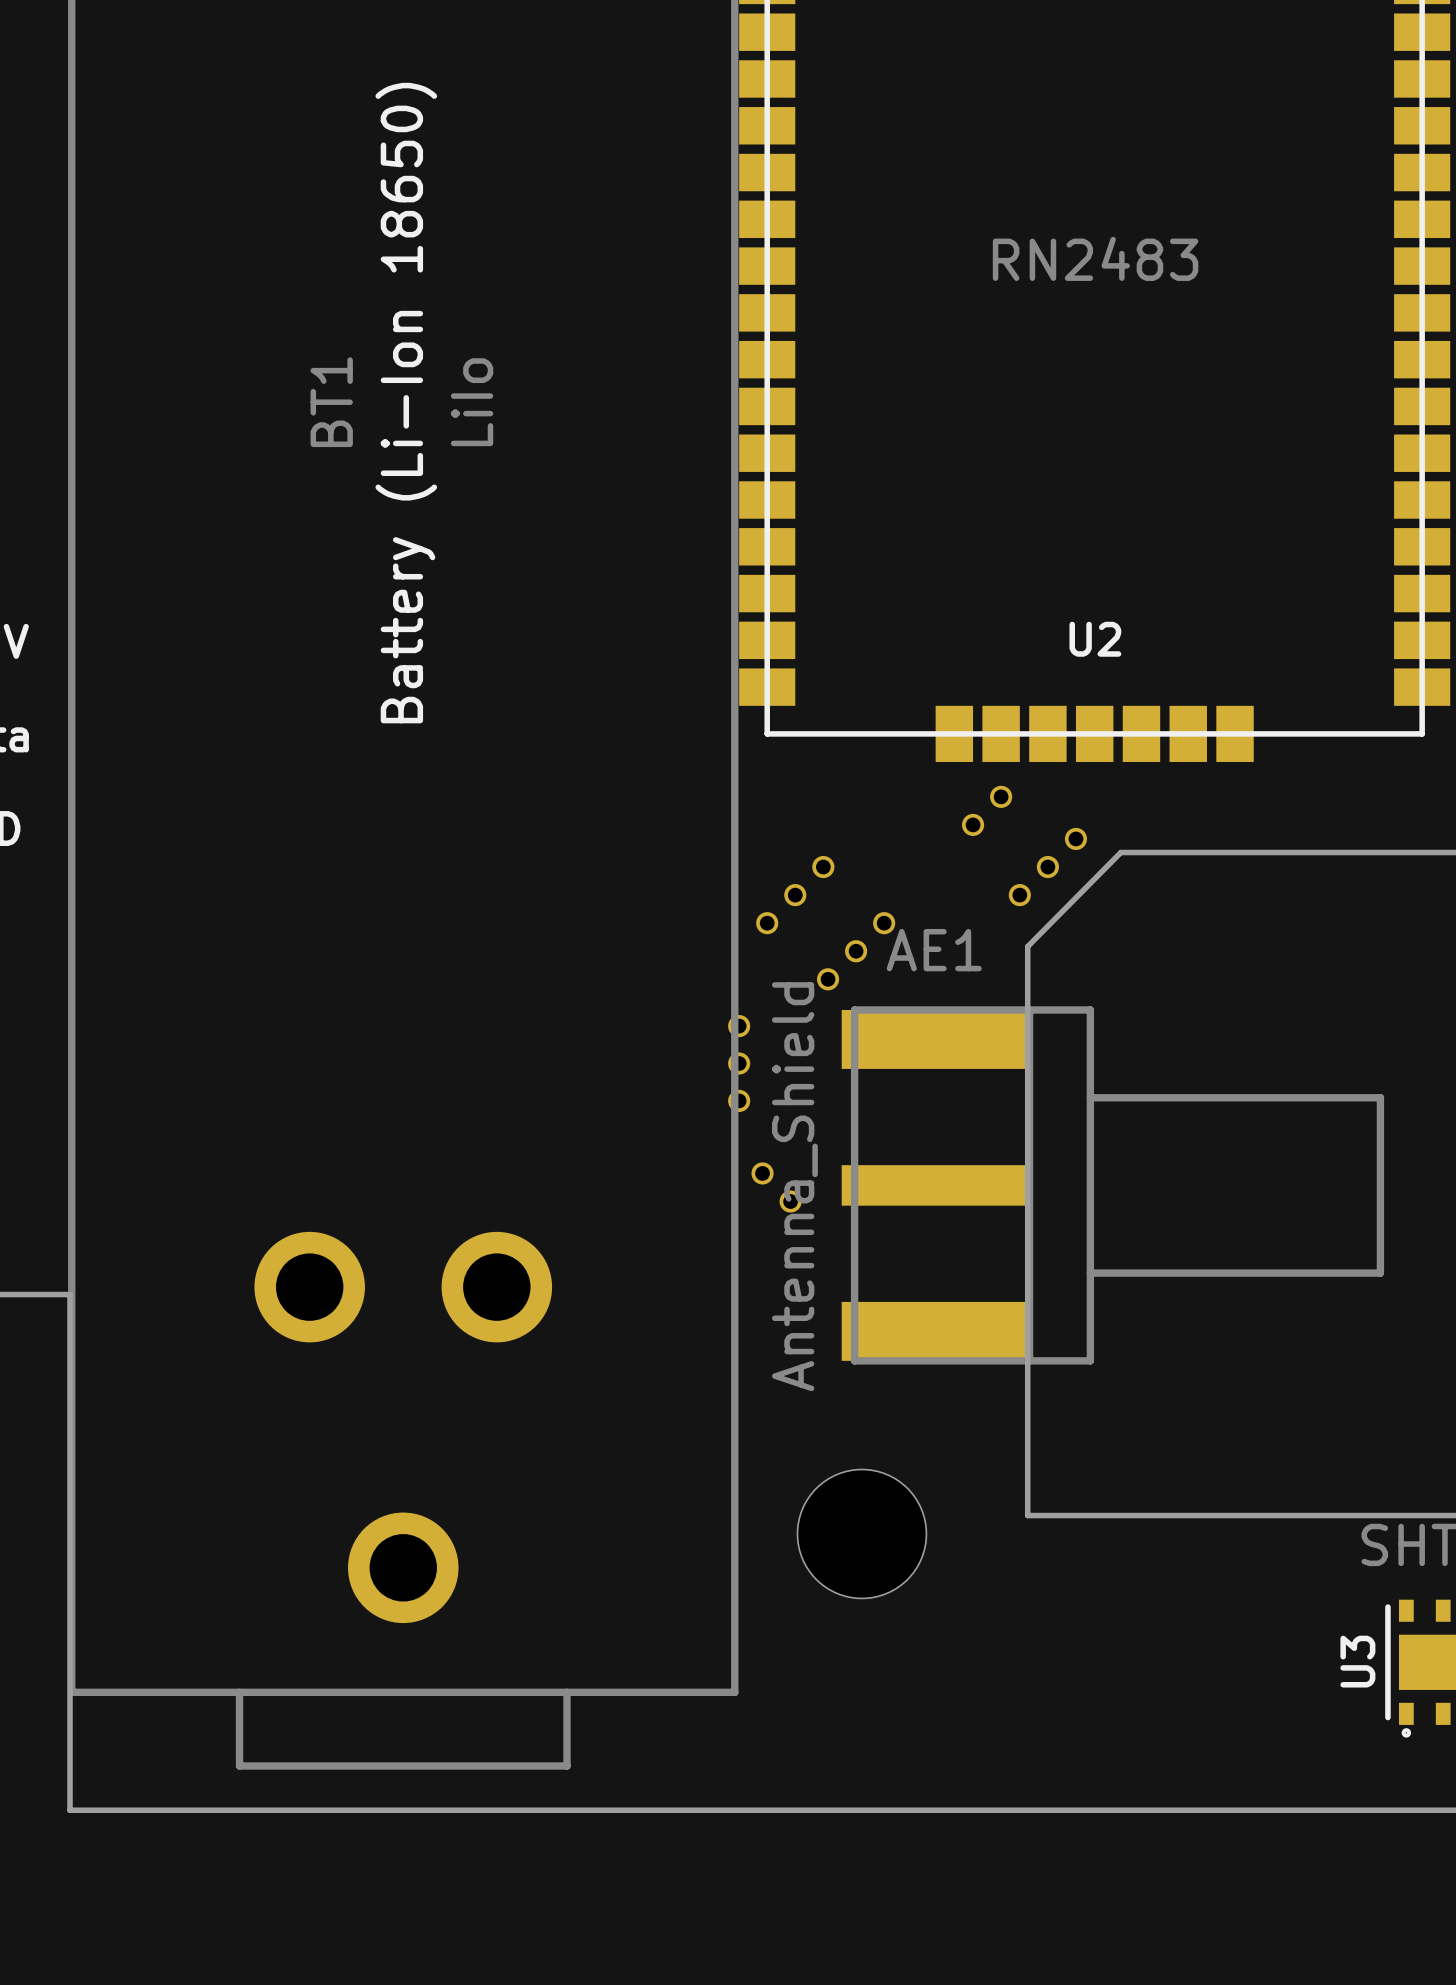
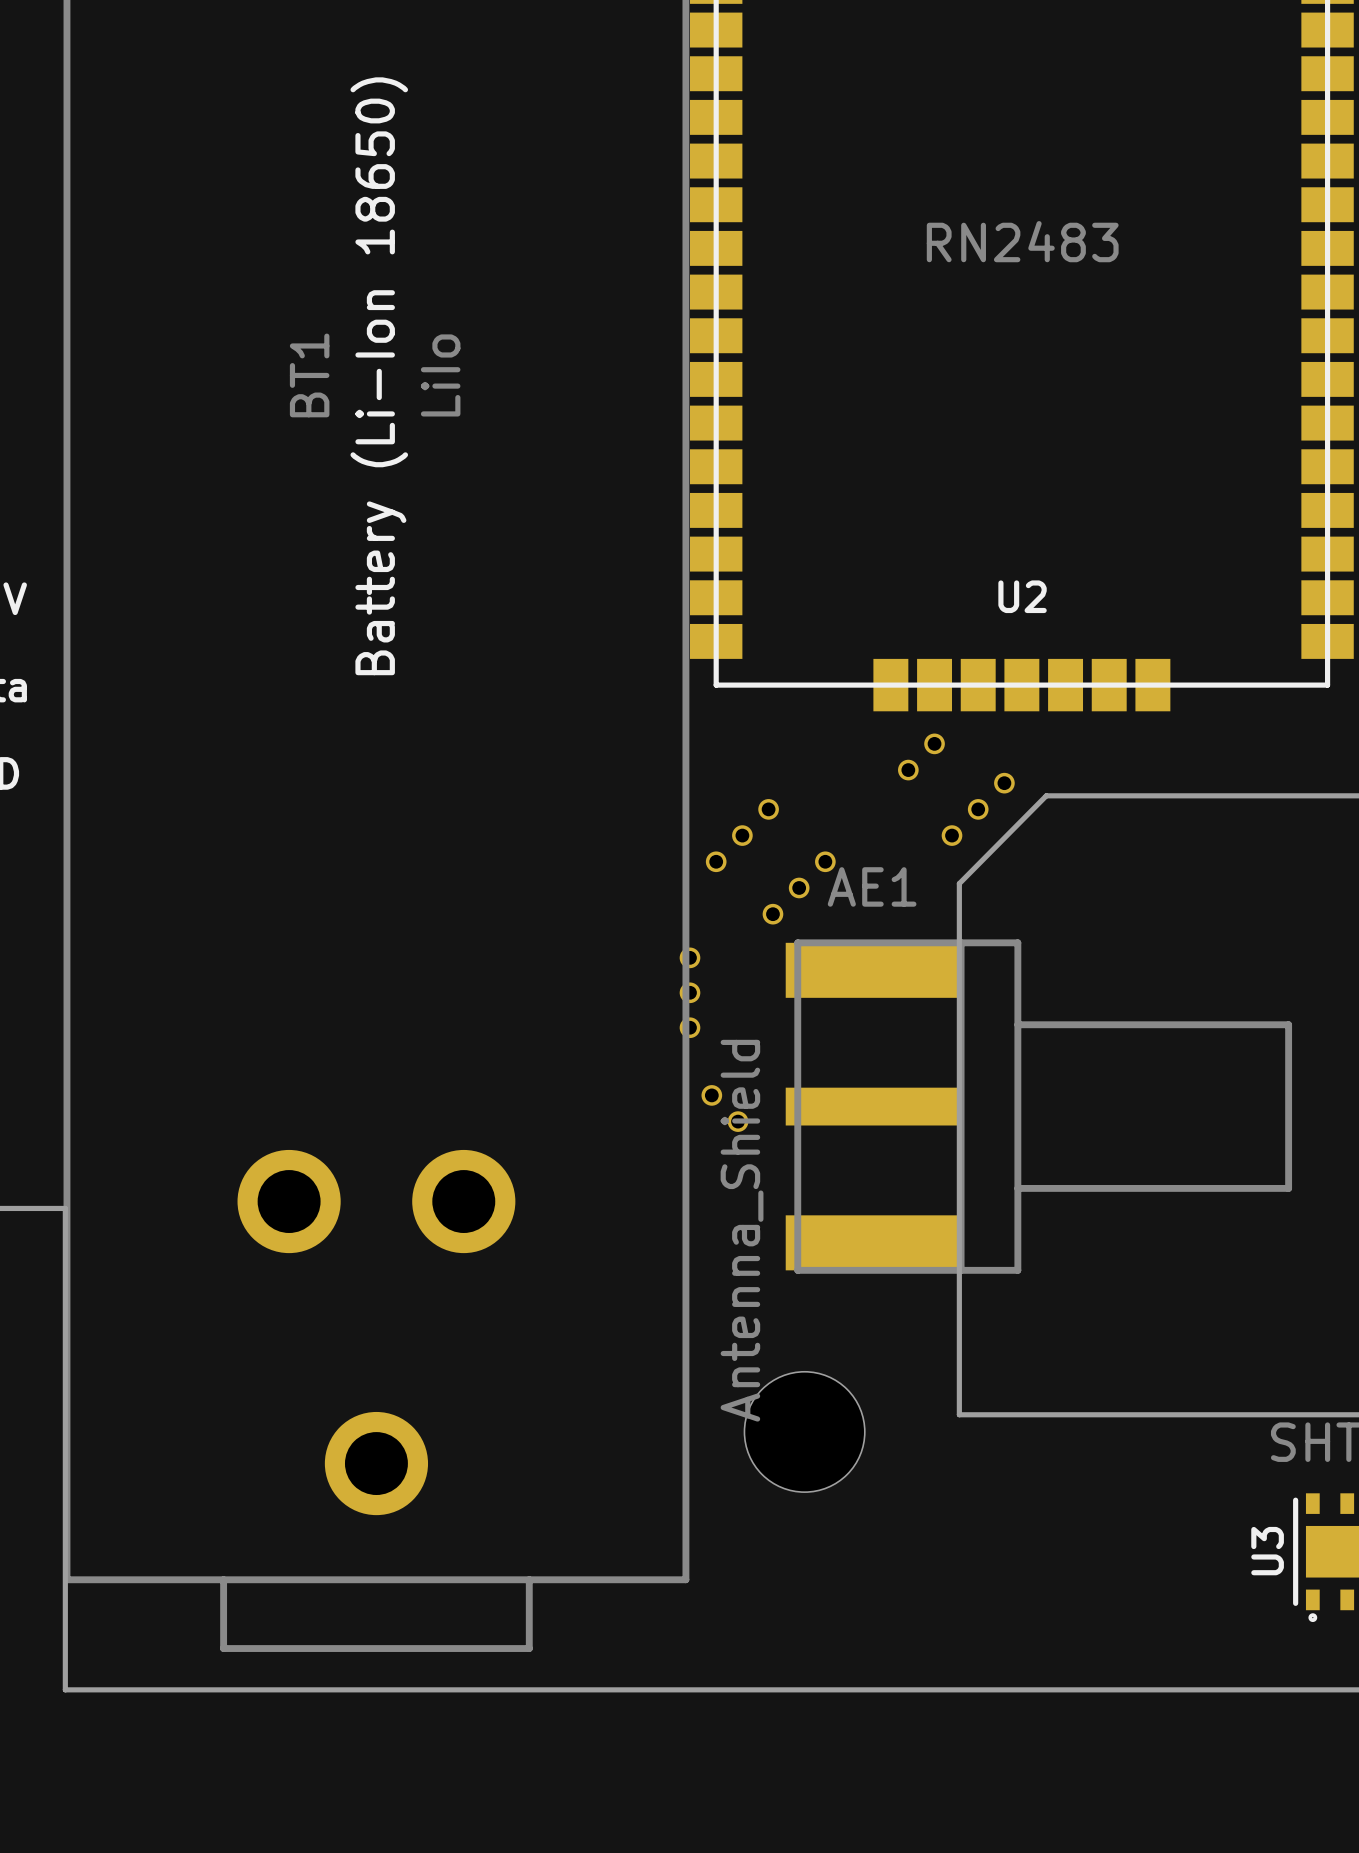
AE1 value position: Antenna_Shield (794, 1186) -> Antenna_Shield (742, 1230)

